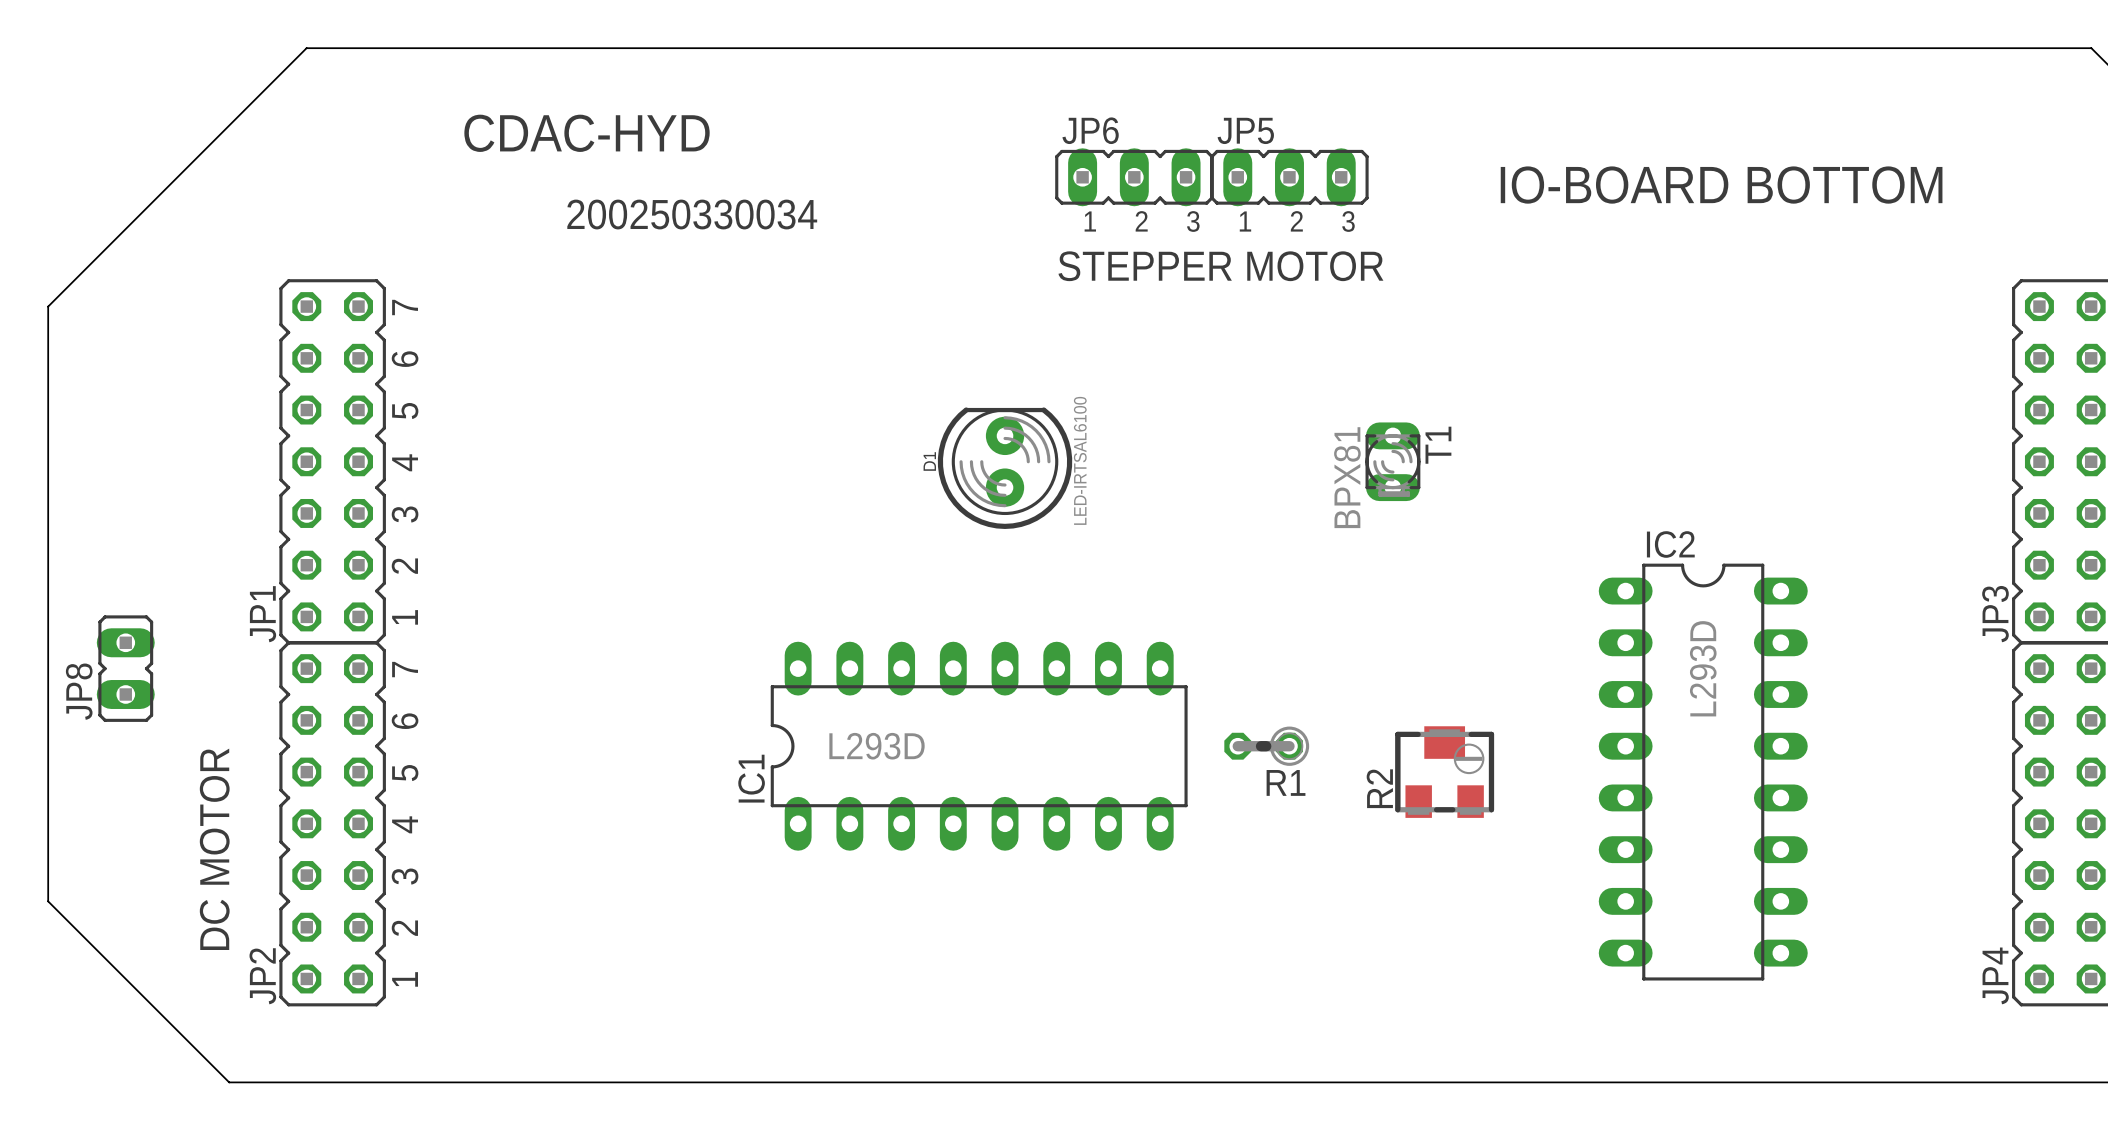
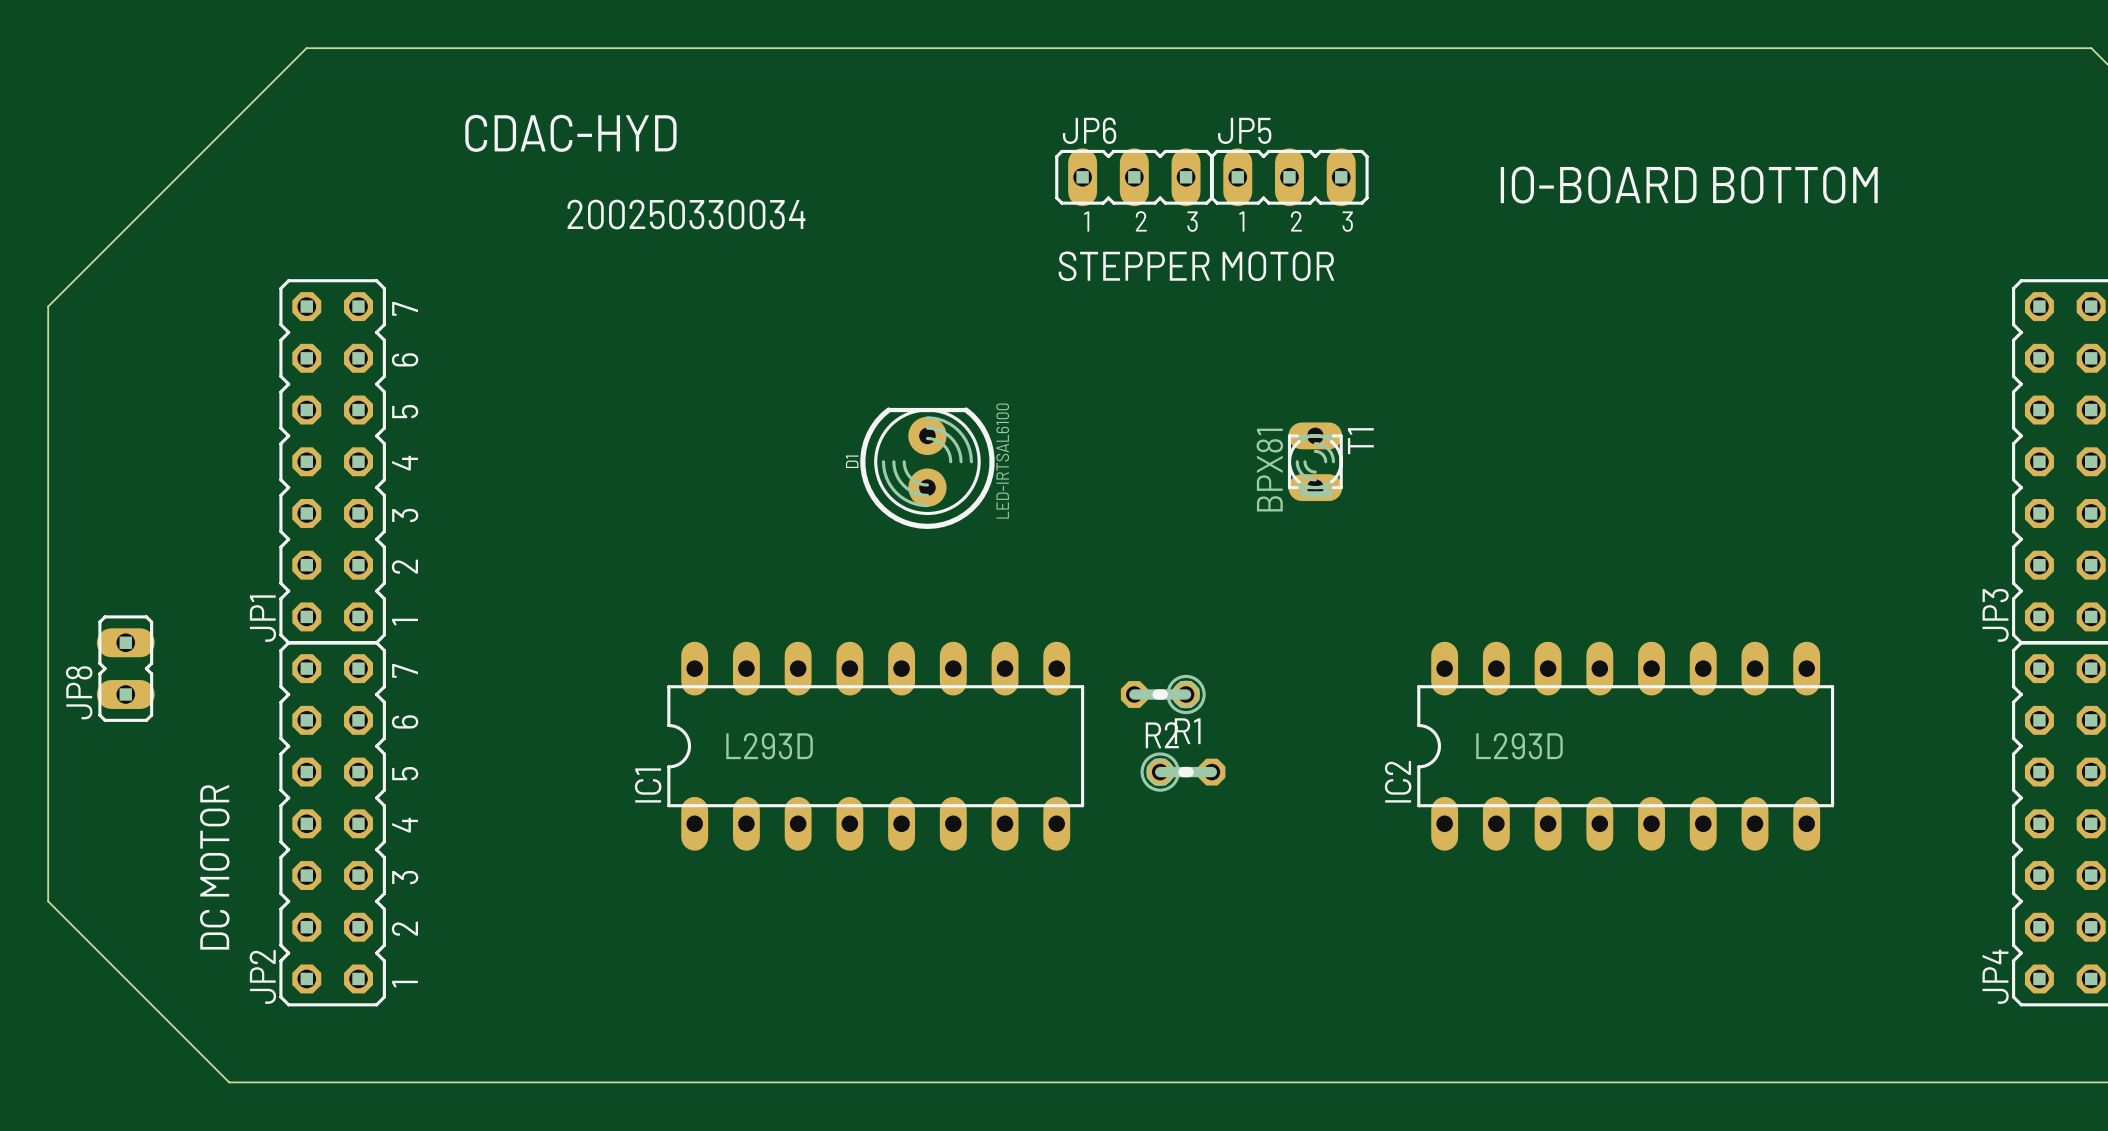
T1 position: (1392, 461) -> (1315, 461)
D1 position: (1005, 468) -> (927, 468)
R2 footprint: [1395, 726, 1495, 818] -> [1140, 752, 1226, 792]
IC1 position: (979, 746) -> (875, 746)
R1 position: (1266, 746) -> (1163, 694)
IC2 rotation: 0° (1703, 772) -> 90° counterclockwise (1625, 746)
R2 name position: R2 (1379, 788) -> R2 (1162, 735)

